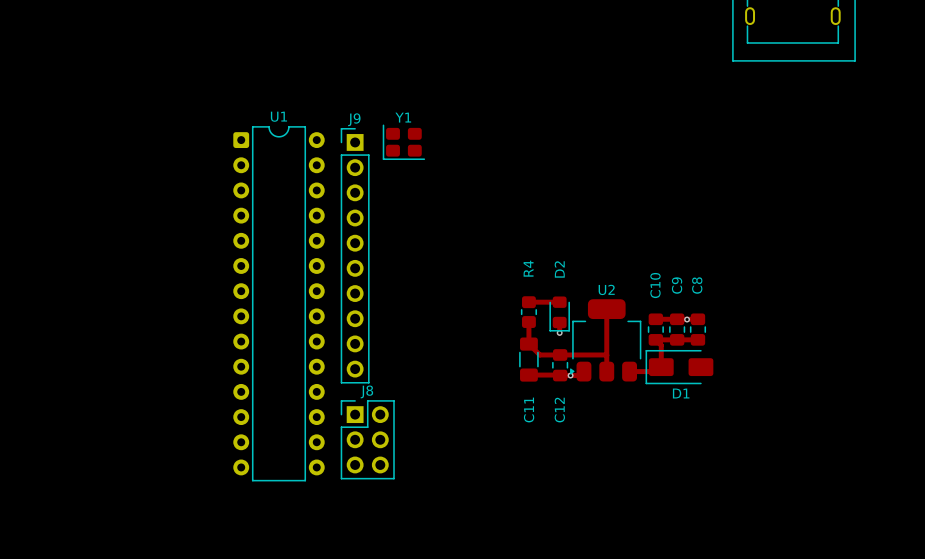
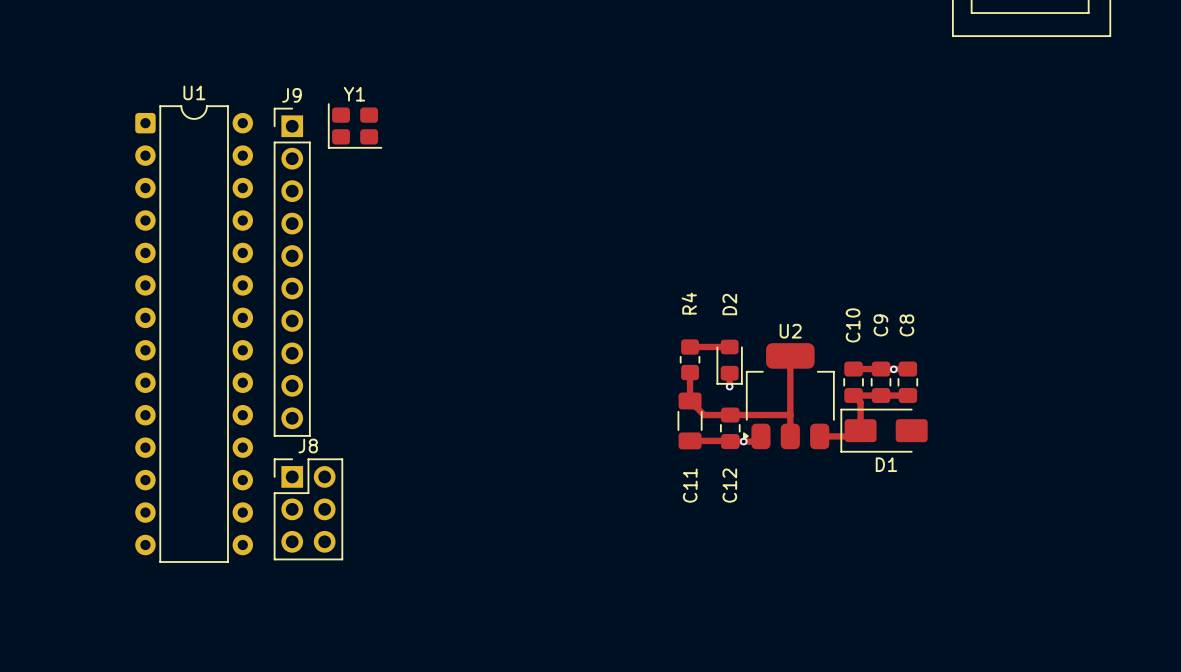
Y1 position: (403, 142) -> (355, 125)
J9 position: (355, 255) -> (292, 272)
U1 position: (278, 303) -> (194, 334)
J8 position: (367, 439) -> (308, 509)

